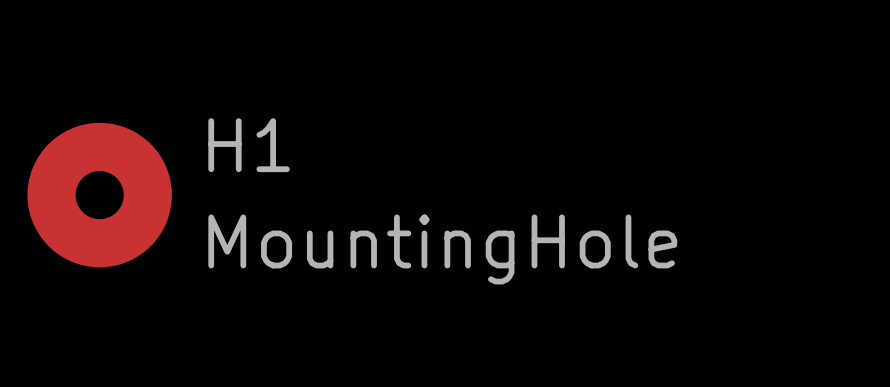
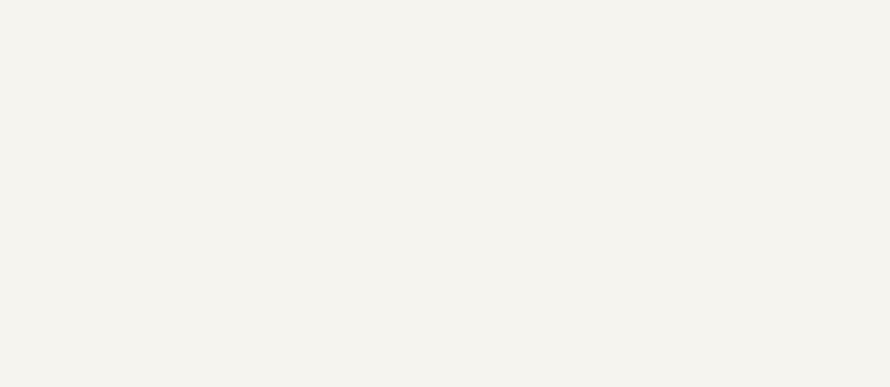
H1: MountingHole (99, 195) -> none

